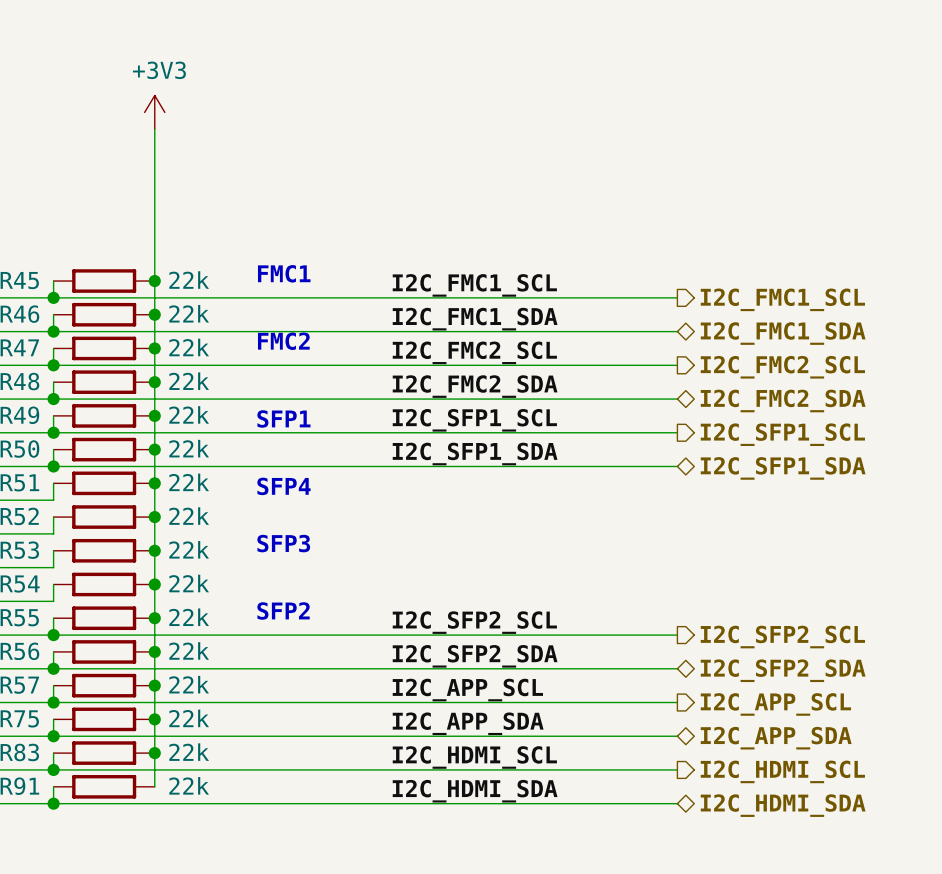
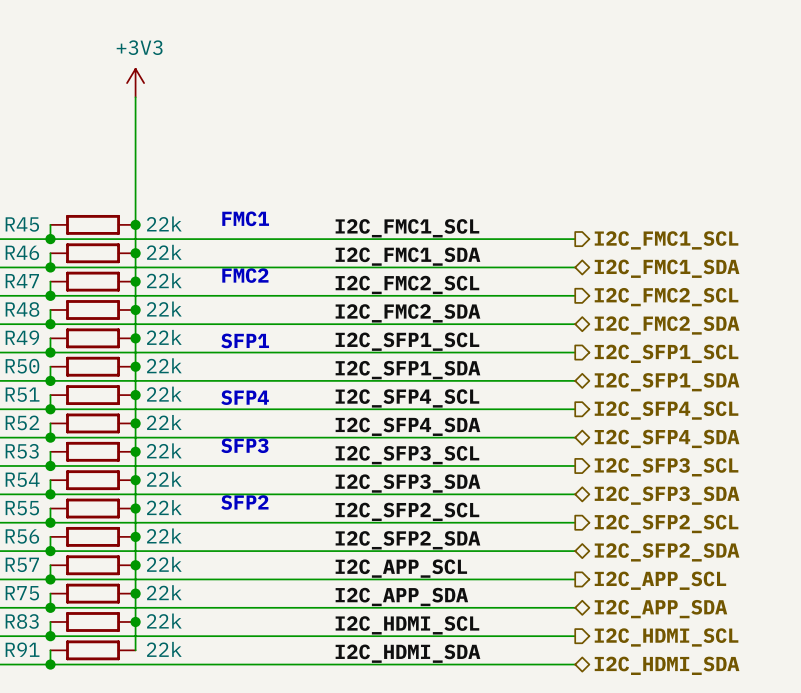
label: none -> I2C_SFP4_SCL (407, 398)
wire: none -> (50, 409) (575, 409)
junction: none -> (50, 409)
hierarchical label: none -> I2C_SFP4_SCL (666, 410)
label: none -> I2C_SFP4_SDA (407, 426)
wire: none -> (50, 437) (575, 437)
junction: none -> (50, 437)
hierarchical label: none -> I2C_SFP4_SDA (667, 438)
label: none -> I2C_SFP3_SCL (407, 455)
wire: none -> (50, 465) (575, 465)
junction: none -> (50, 465)
hierarchical label: none -> I2C_SFP3_SCL (666, 467)
label: none -> I2C_SFP3_SDA (407, 483)
wire: none -> (50, 494) (575, 494)
junction: none -> (50, 494)
hierarchical label: none -> I2C_SFP3_SDA (667, 495)

